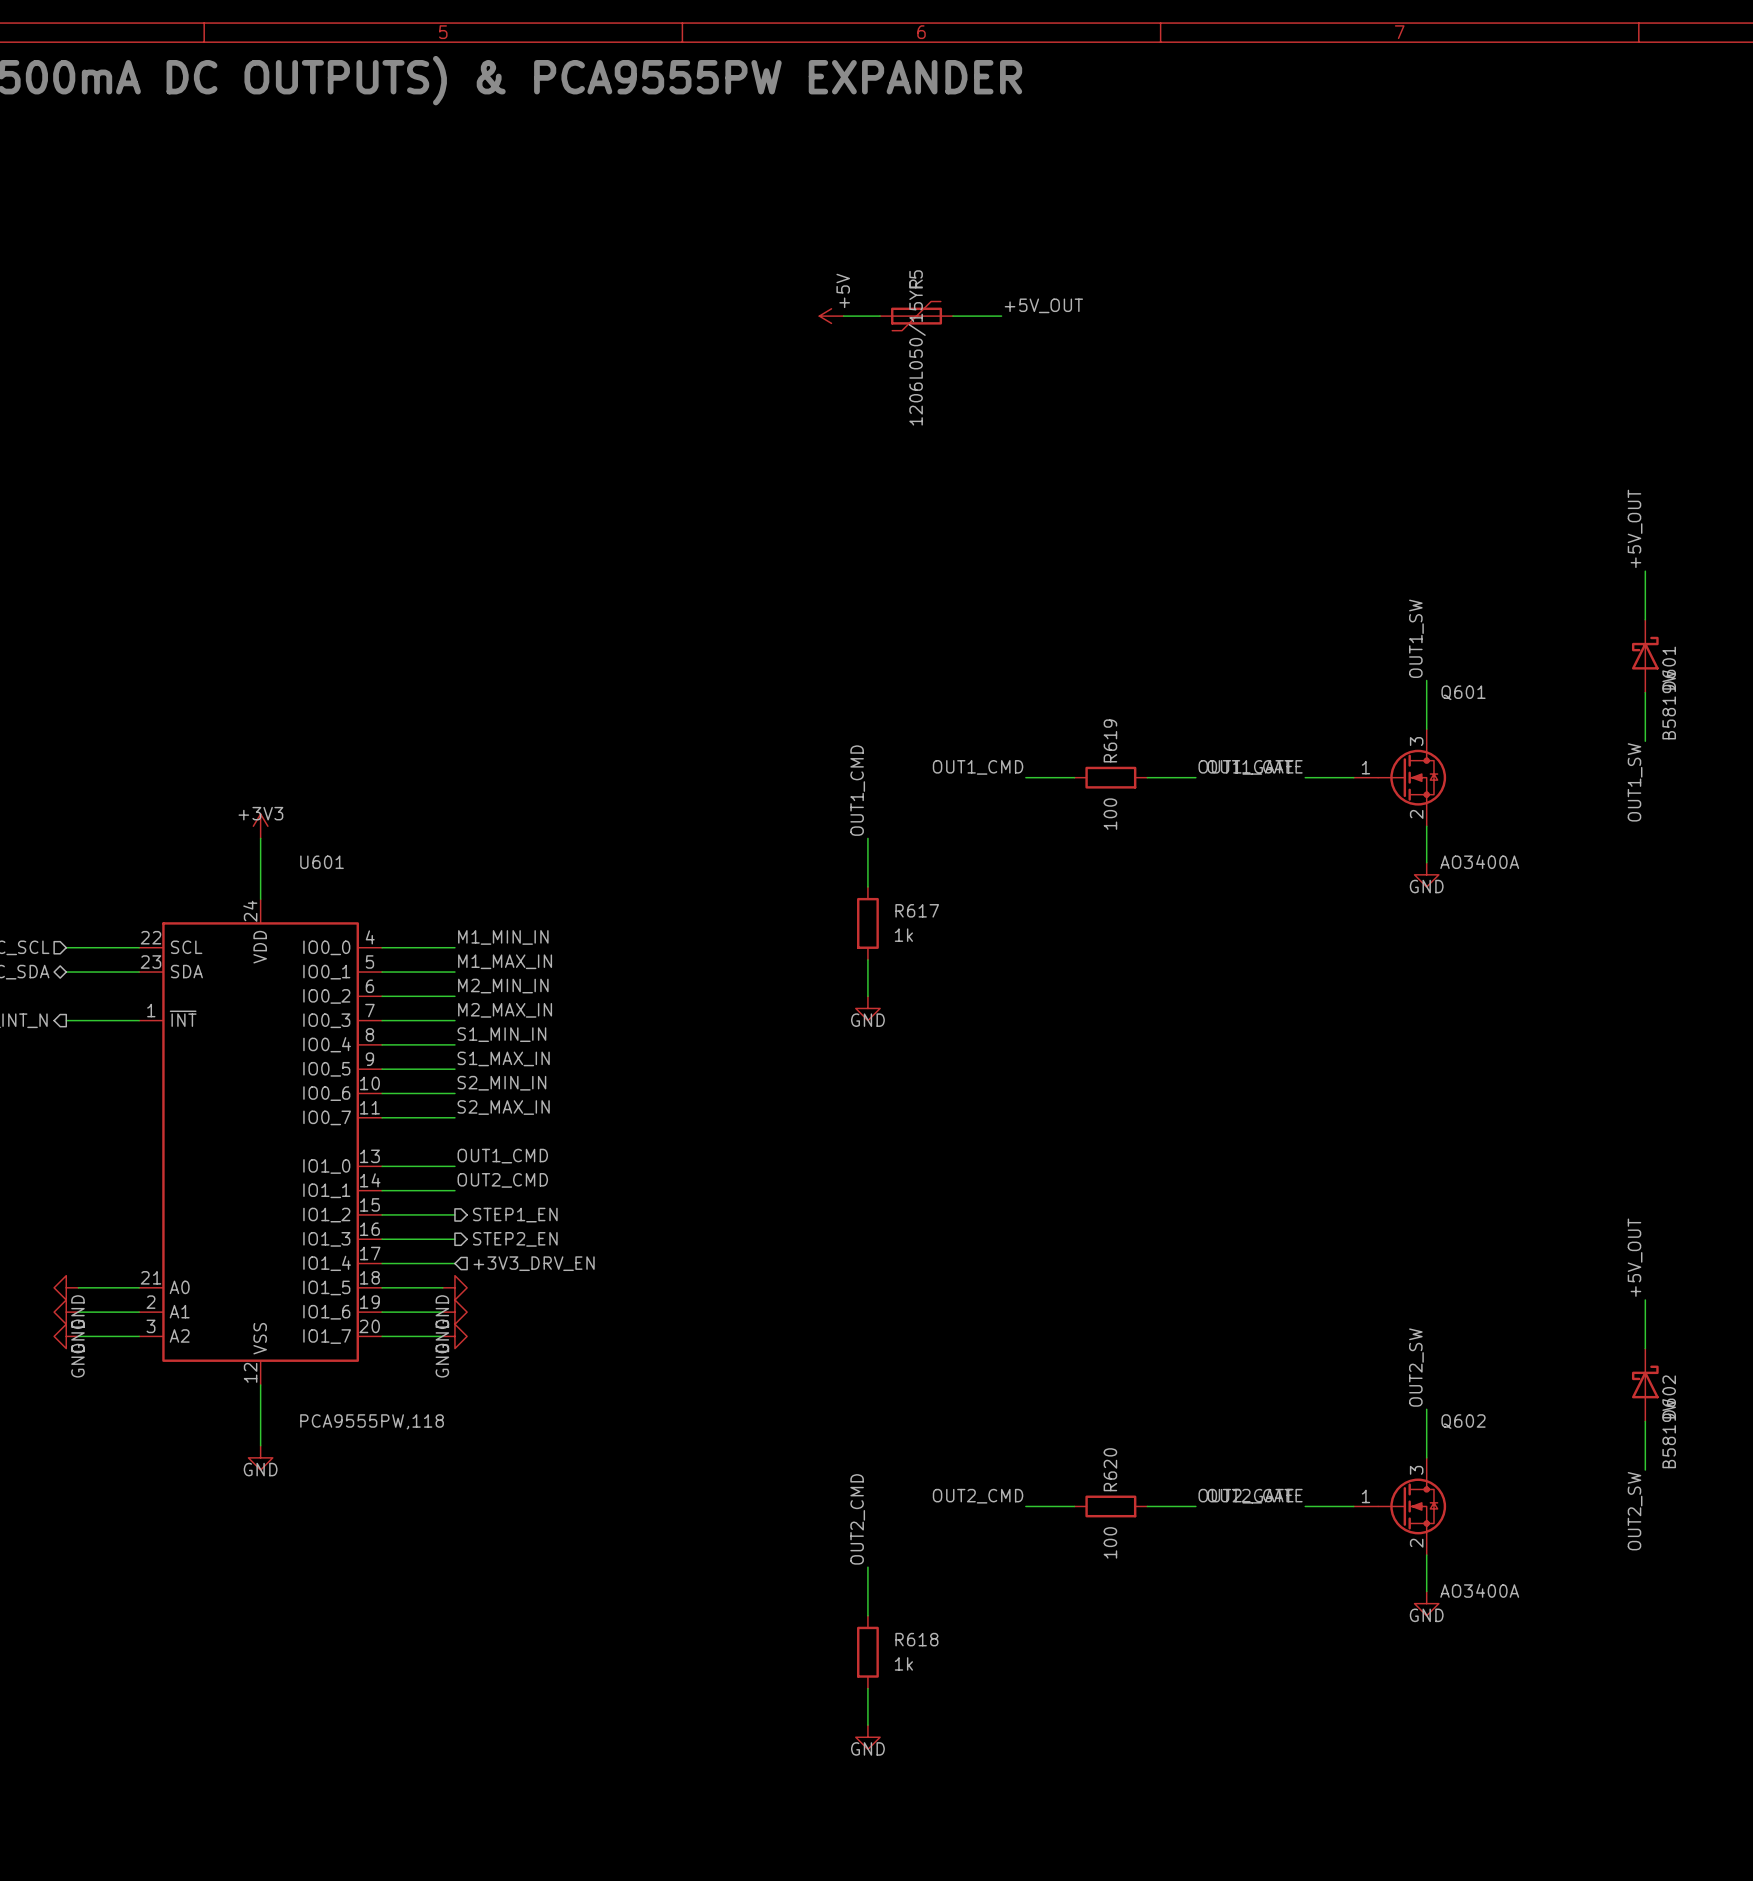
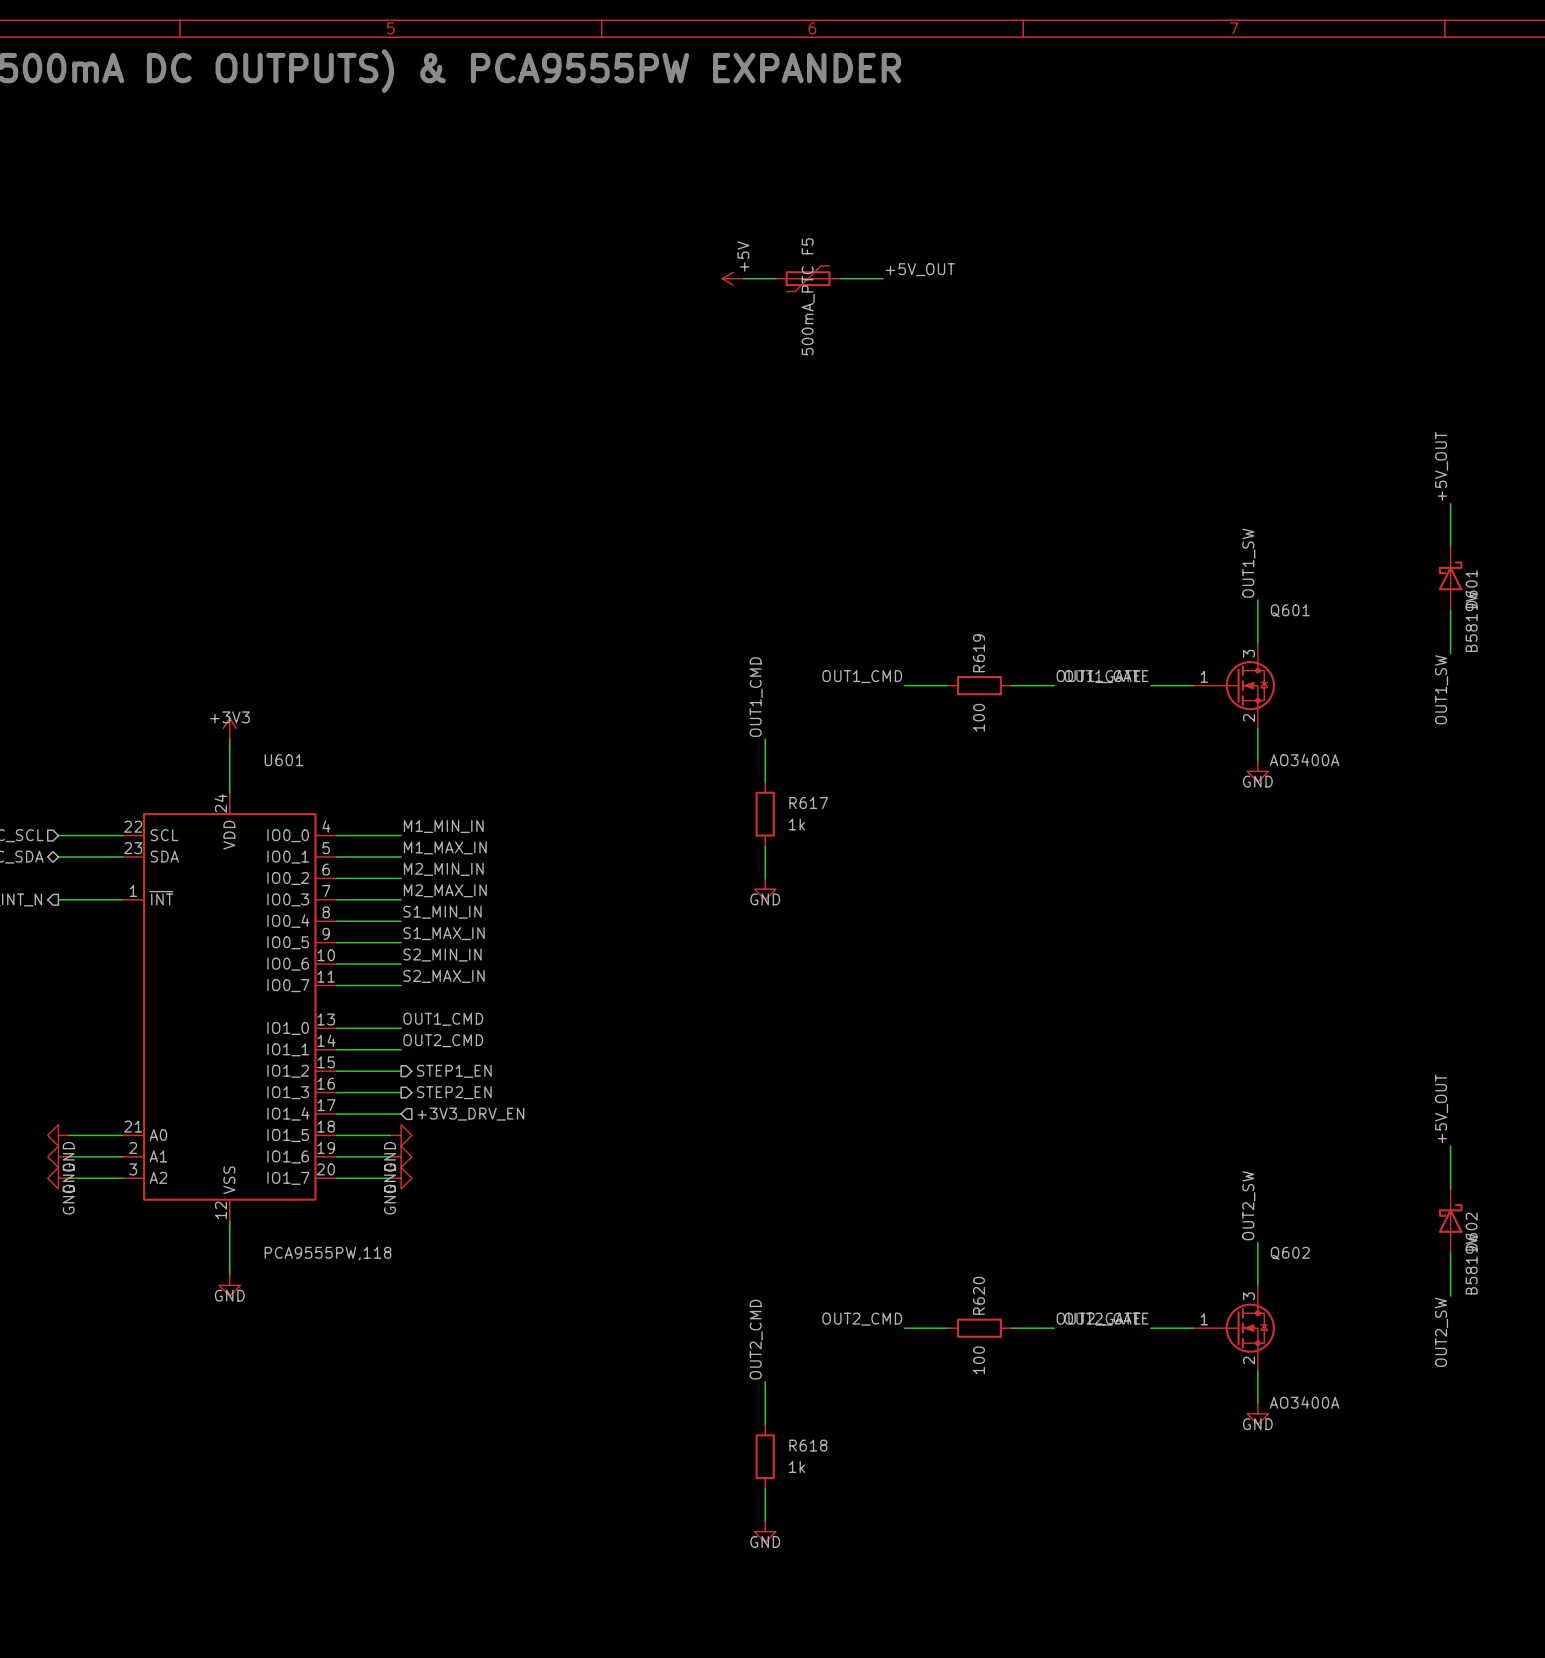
F5 value: 1206L050/15YR (917, 352) -> 500mA_PTC (808, 310)

